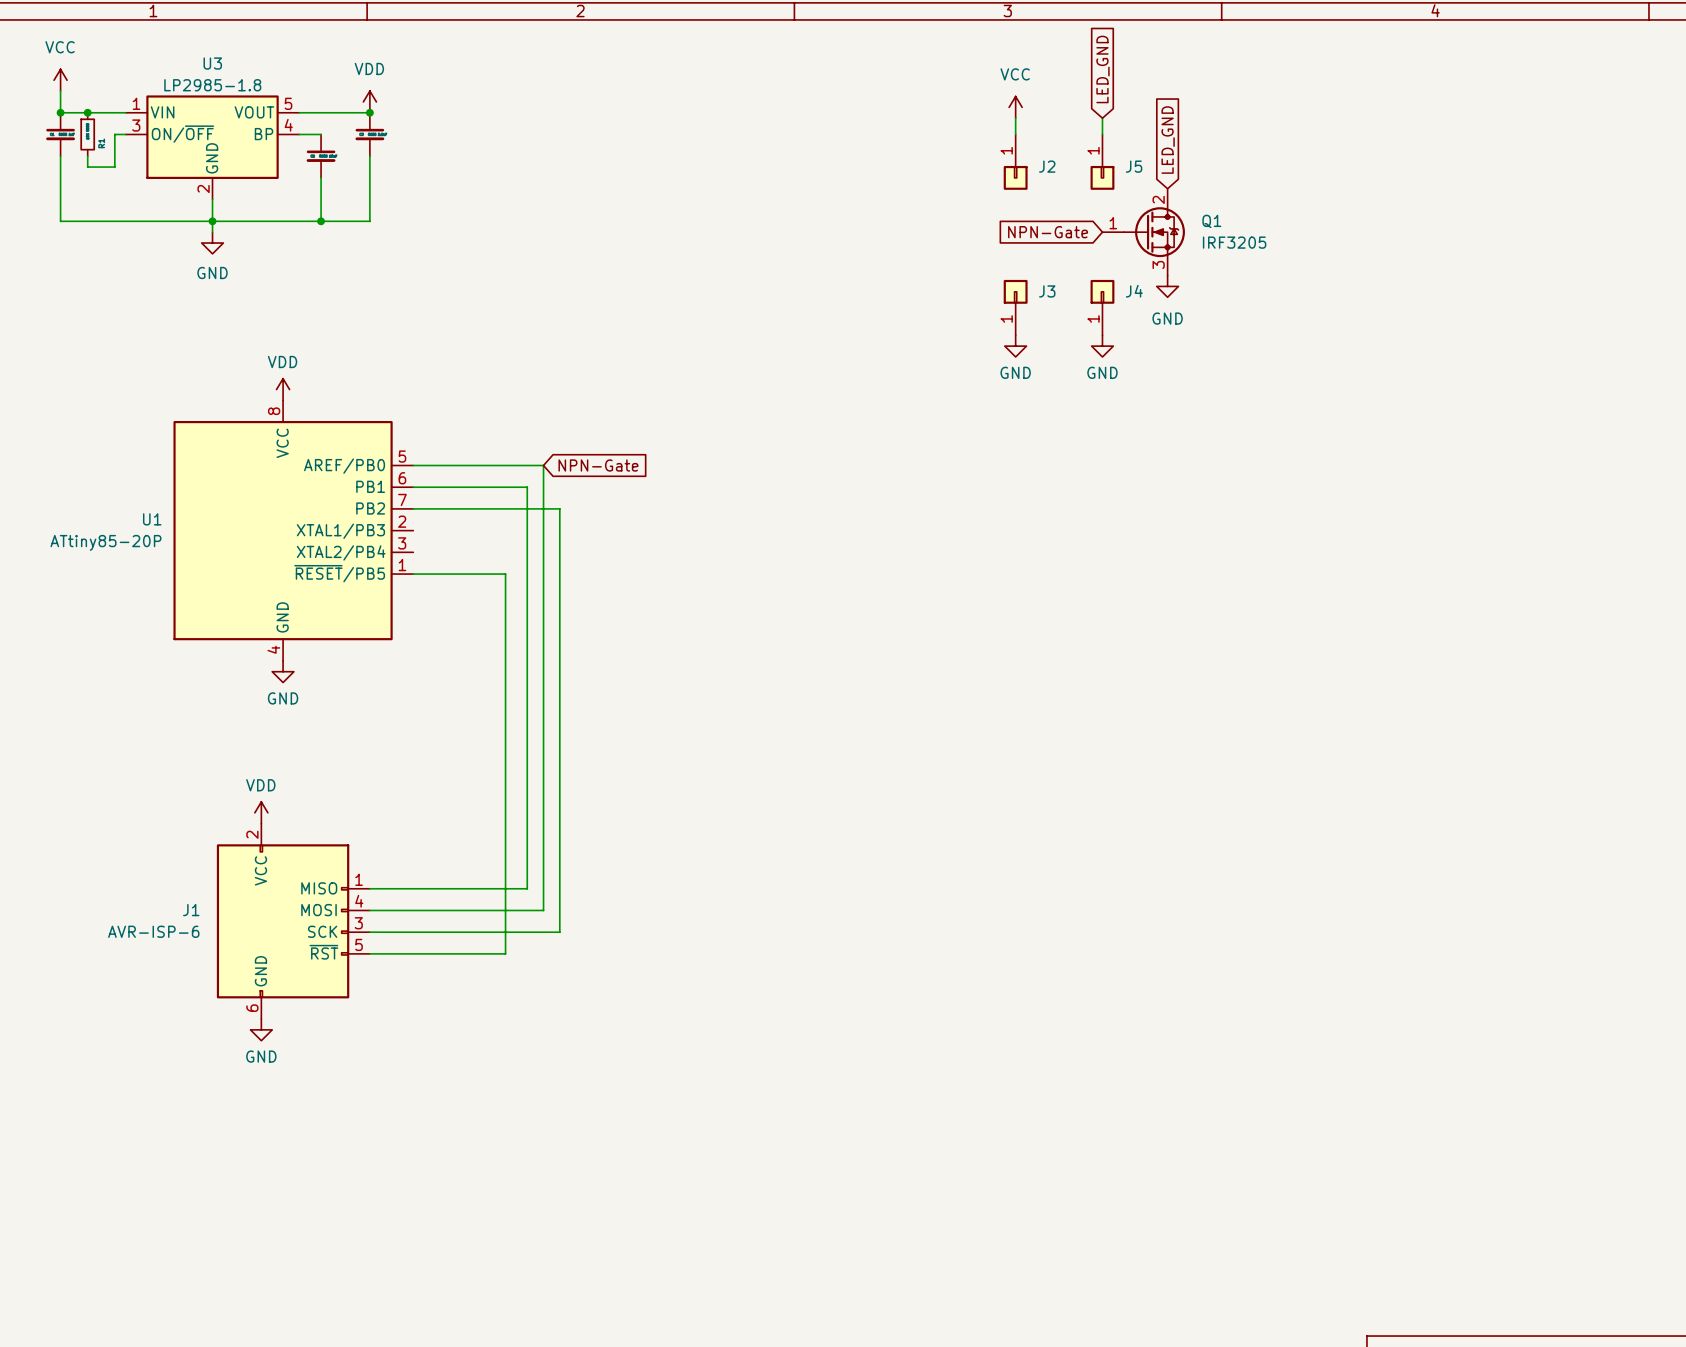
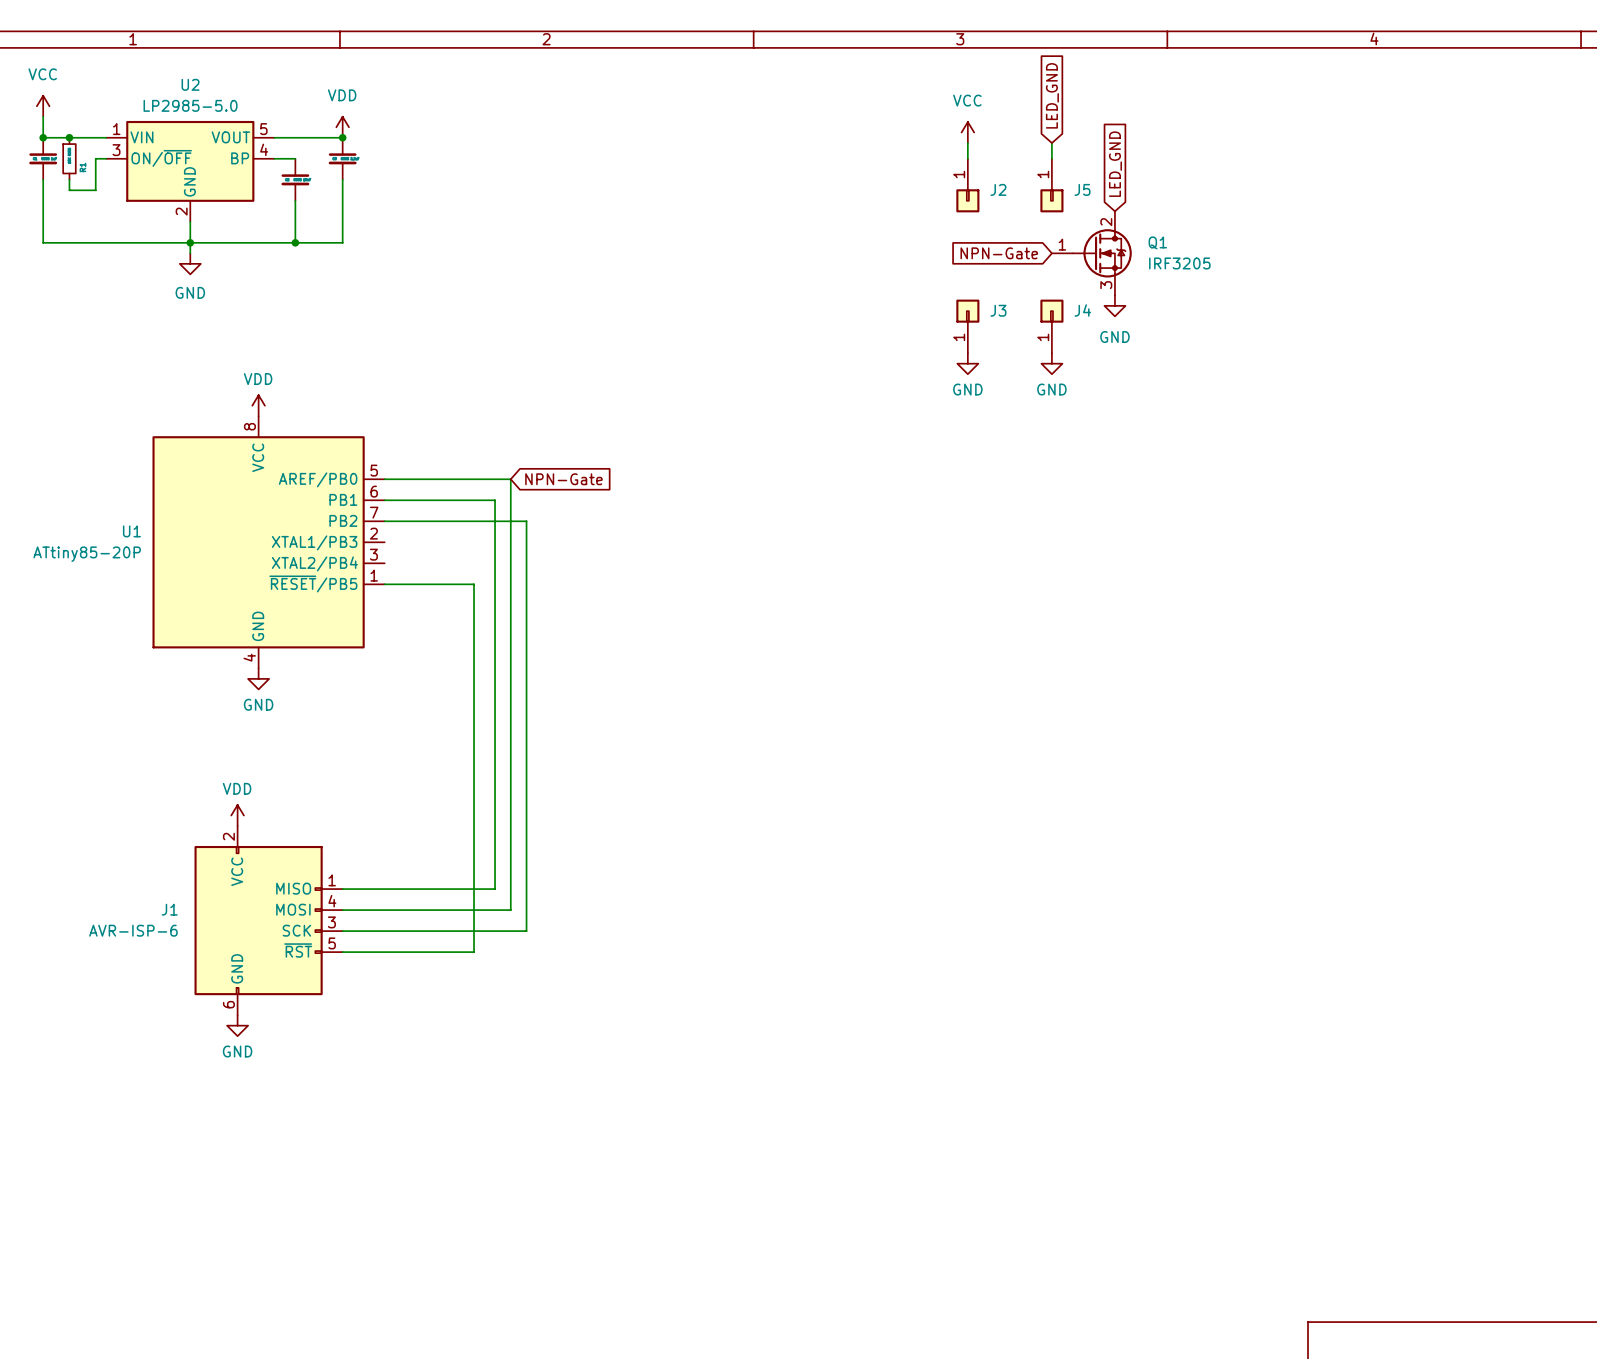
U3 name: U3 (212, 63) -> U2 (190, 84)
U3 value: LP2985-1.8 (212, 85) -> LP2985-5.0 (190, 105)

